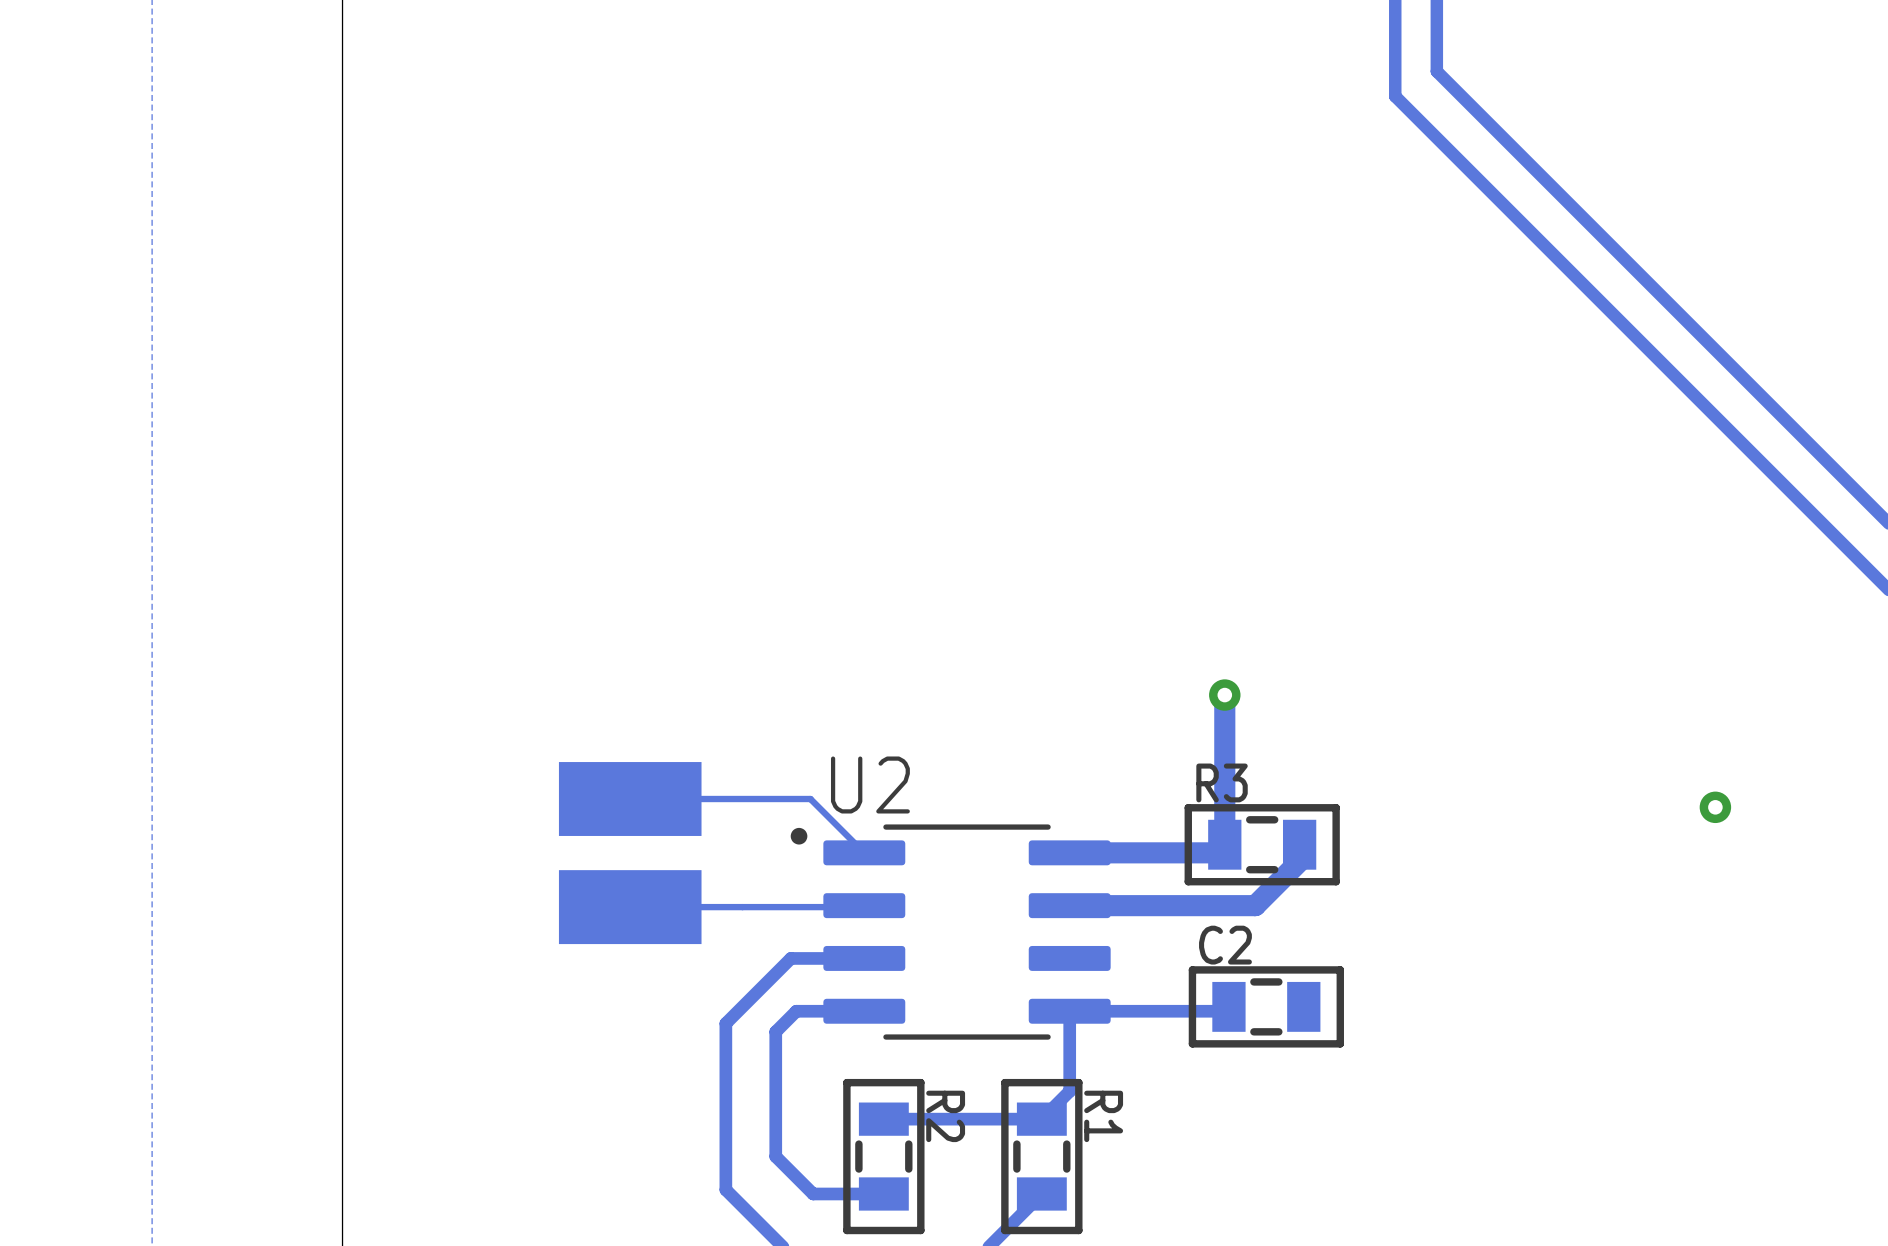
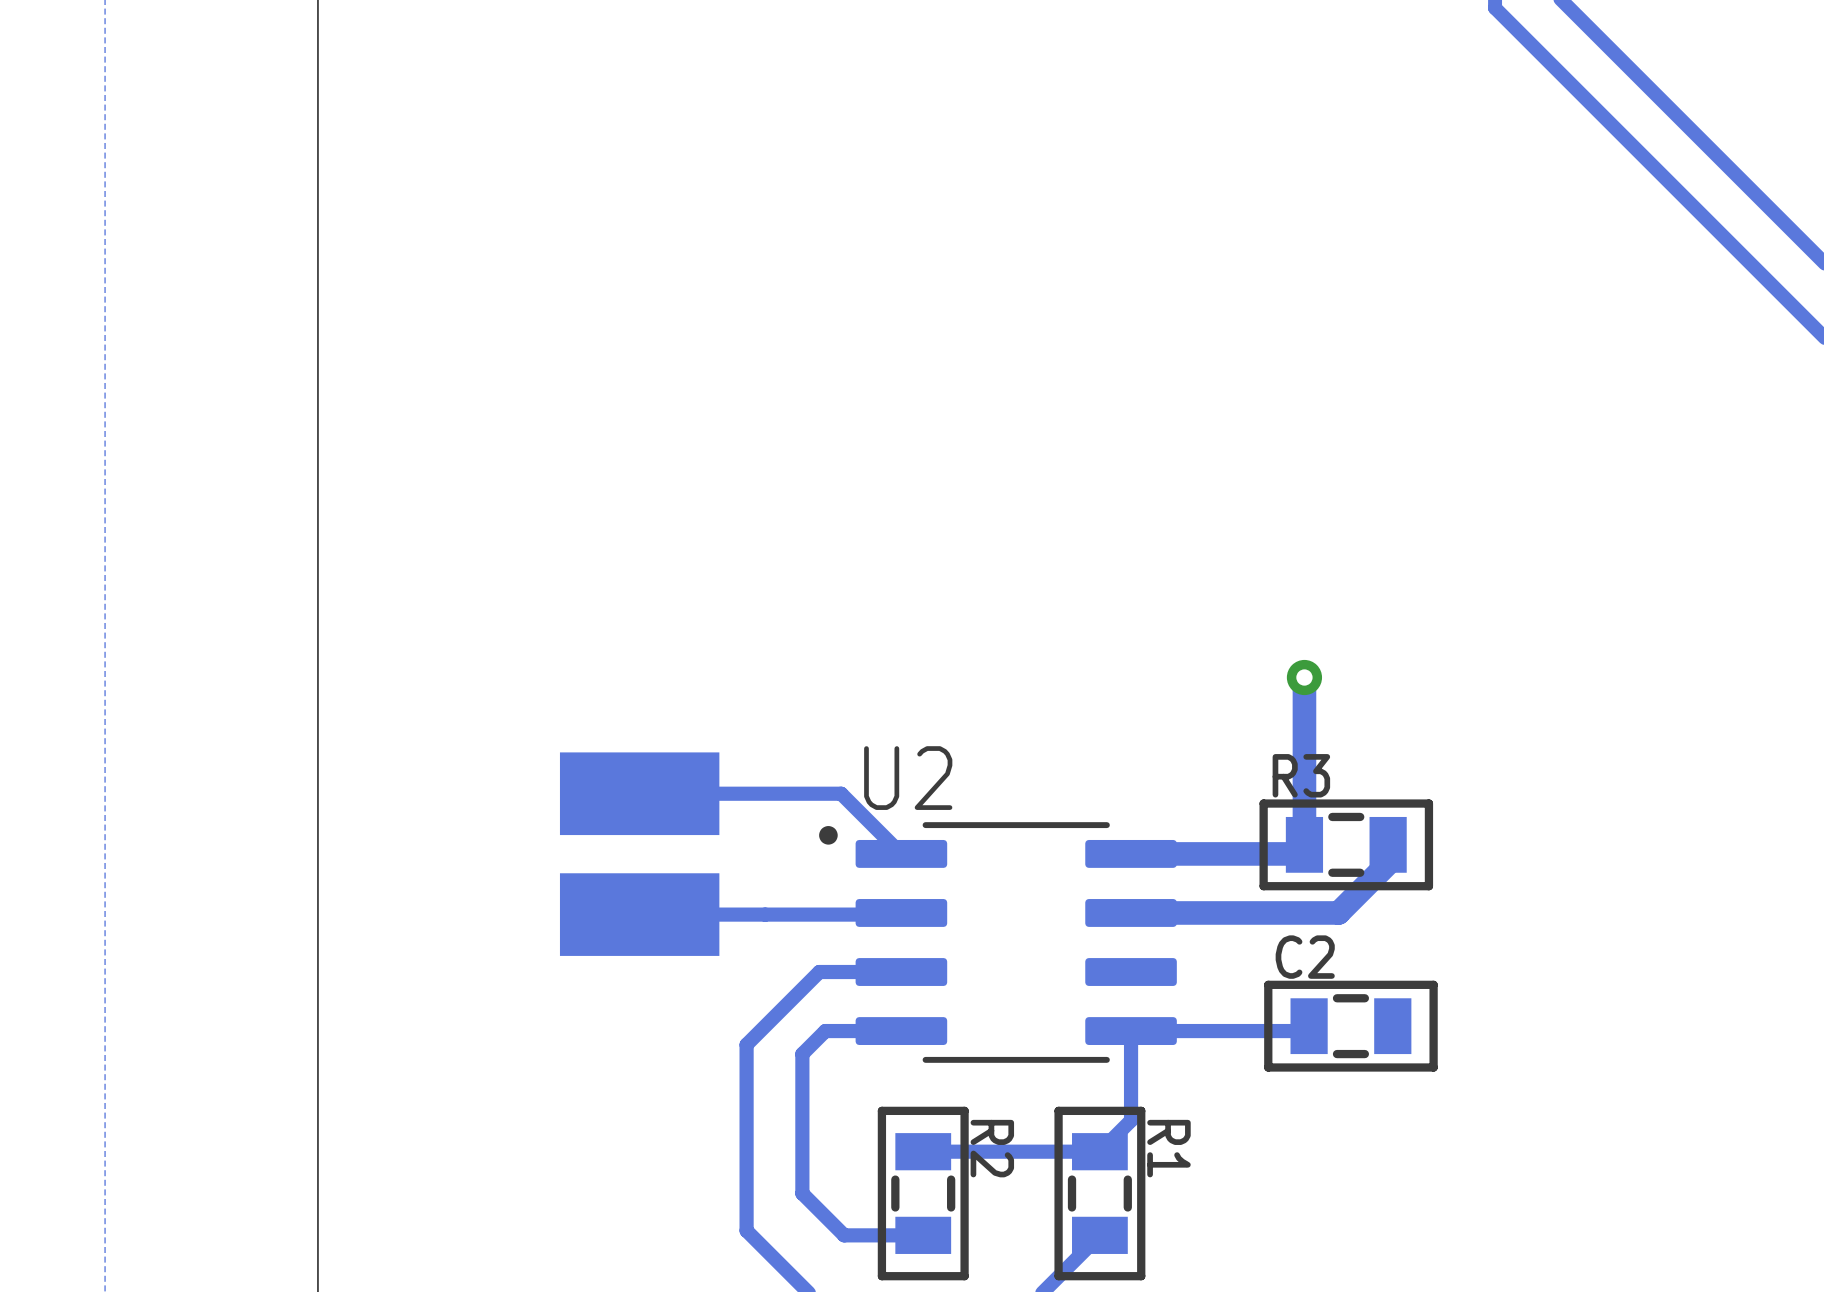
track width: thin (630, 799) (810, 799) (864, 852) -> thick (639, 793) (841, 793) (901, 853)
track width: thin (862, 907) (630, 907) -> thick (899, 914) (639, 914)

